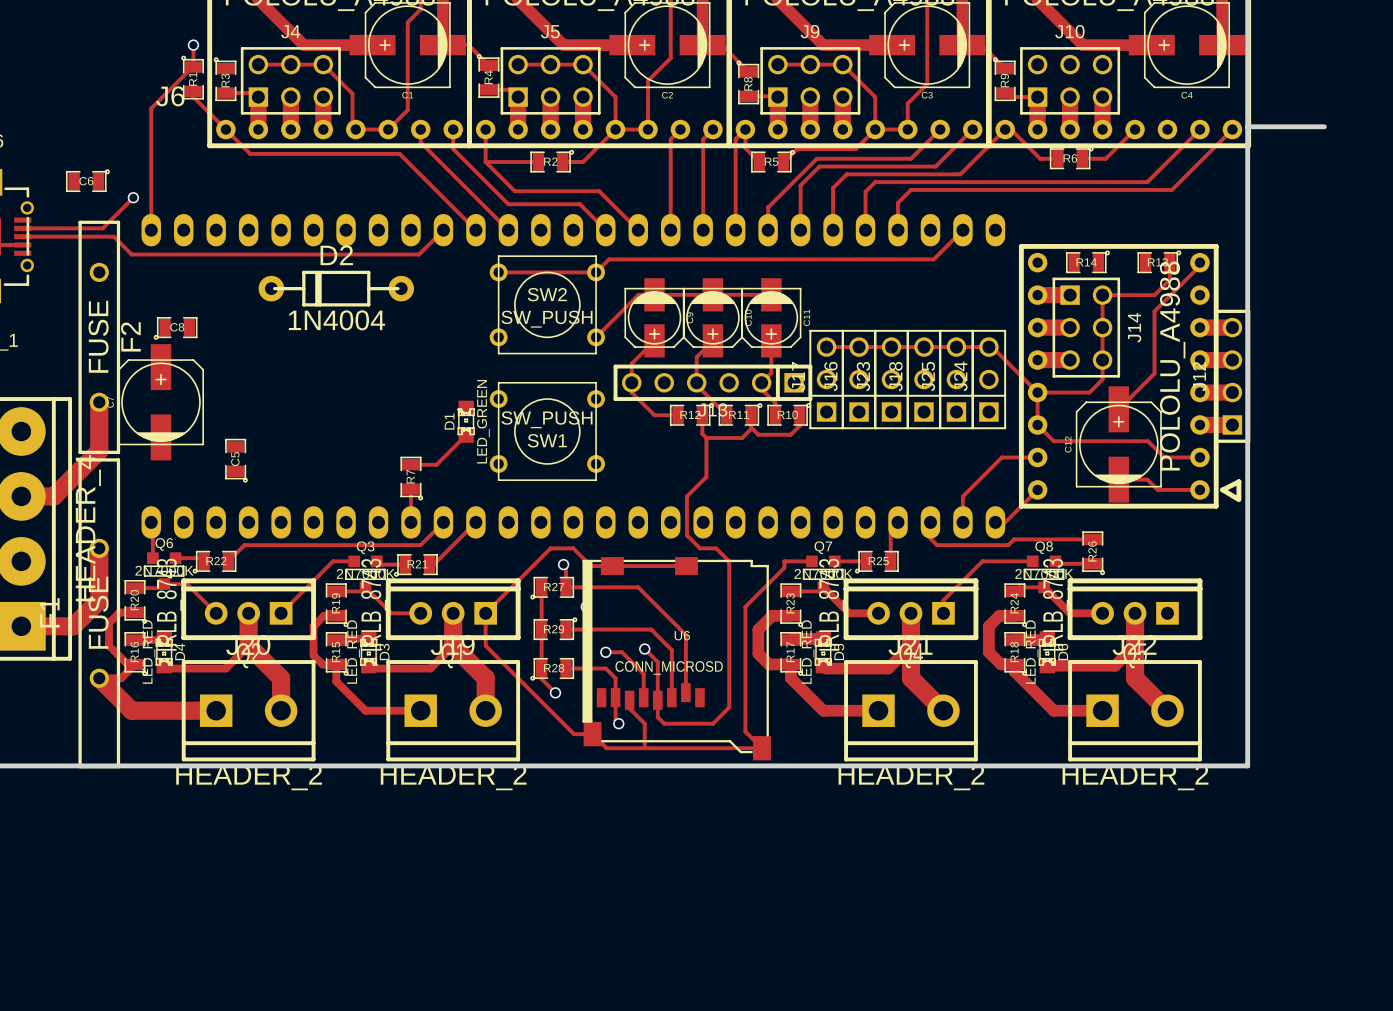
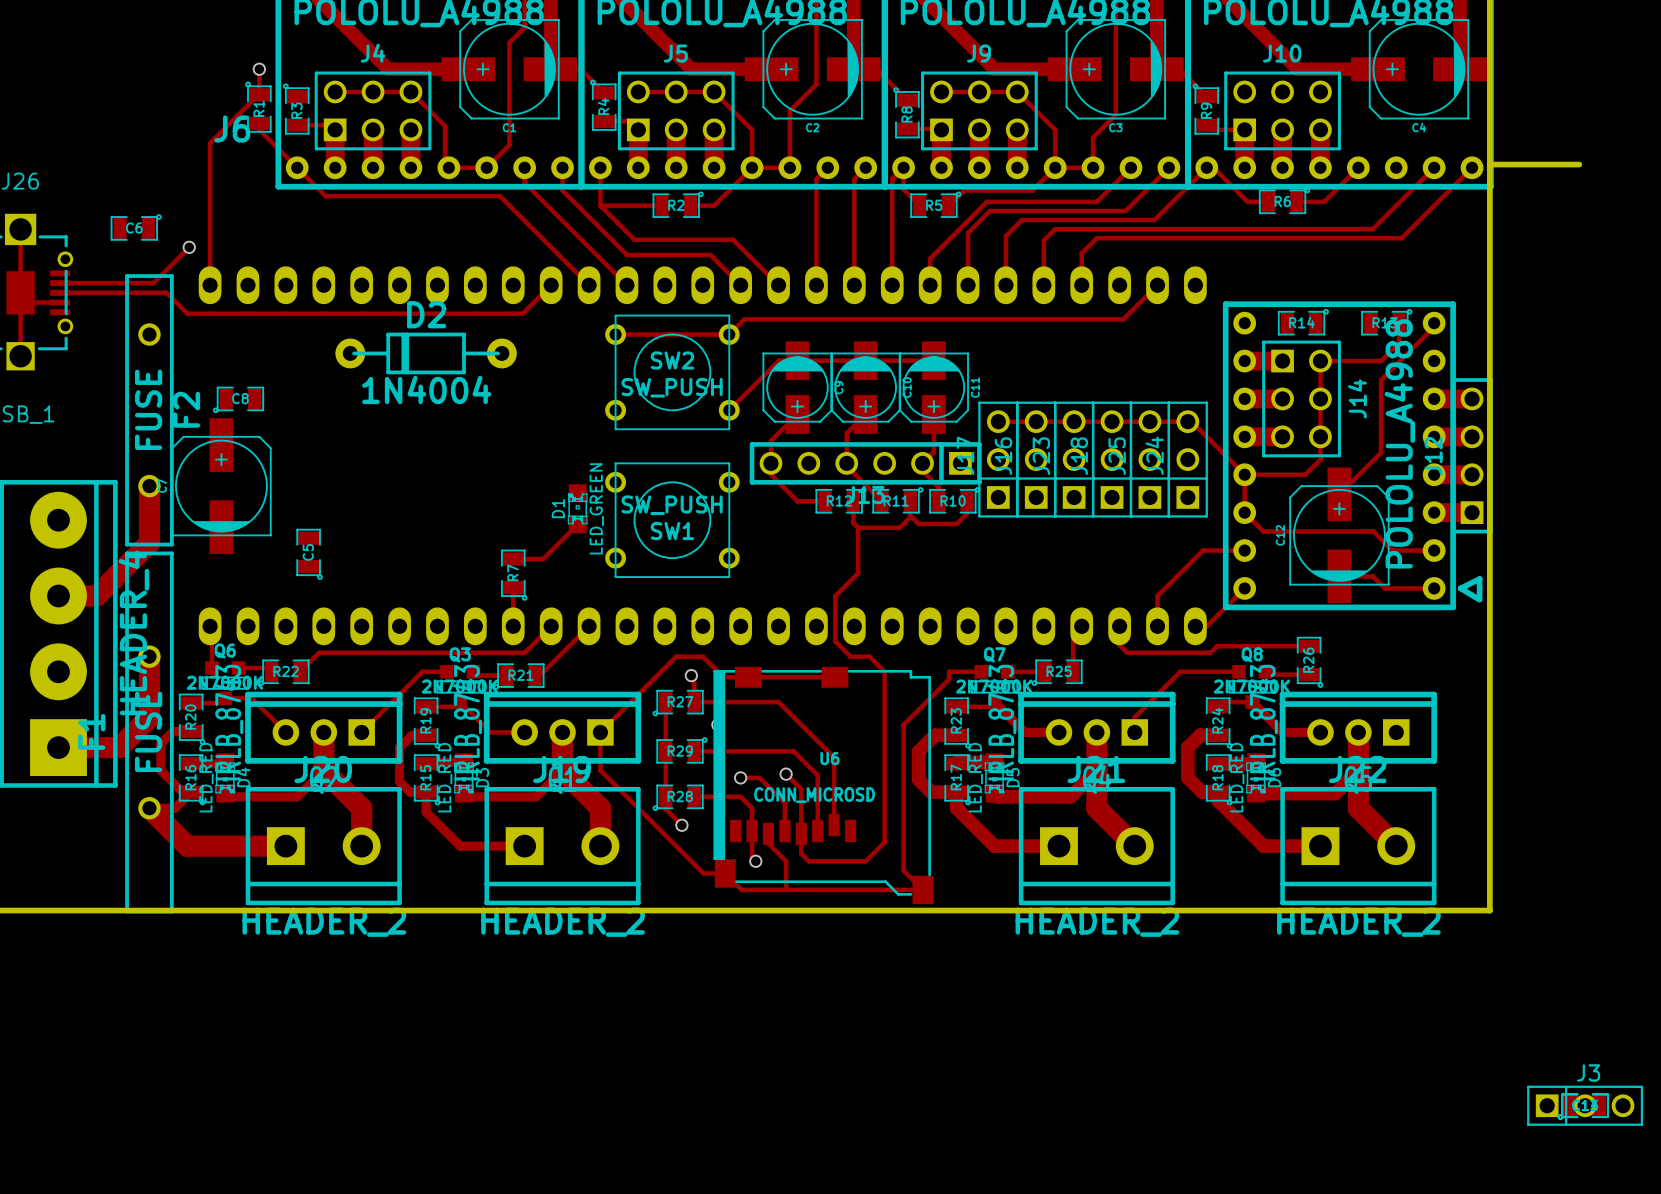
part: none -> (1583, 1106)
part: none -> (1583, 1106)
J3: none -> (1585, 1105)

